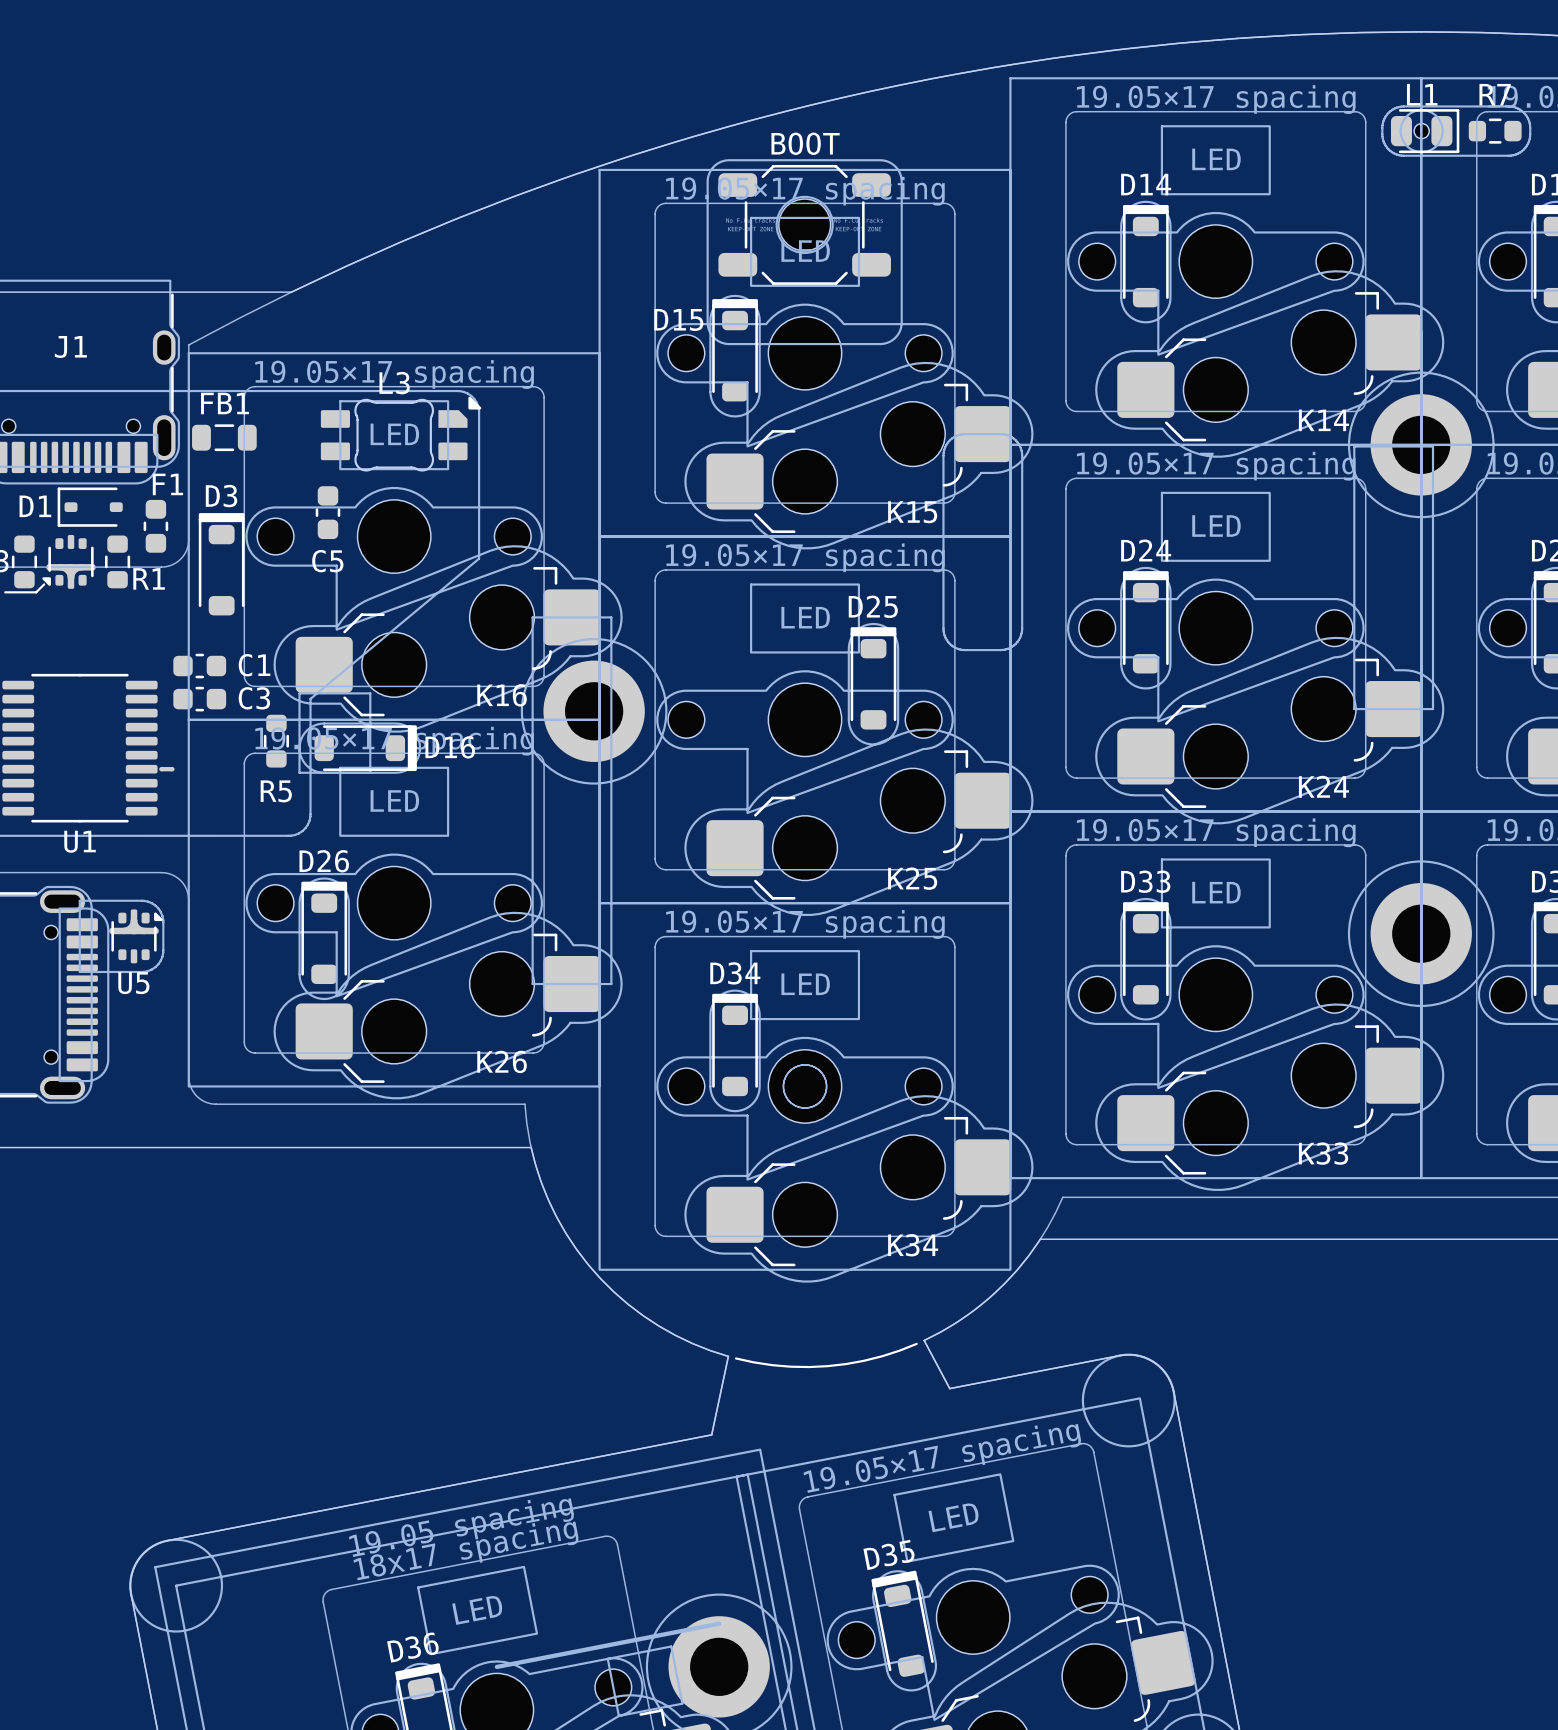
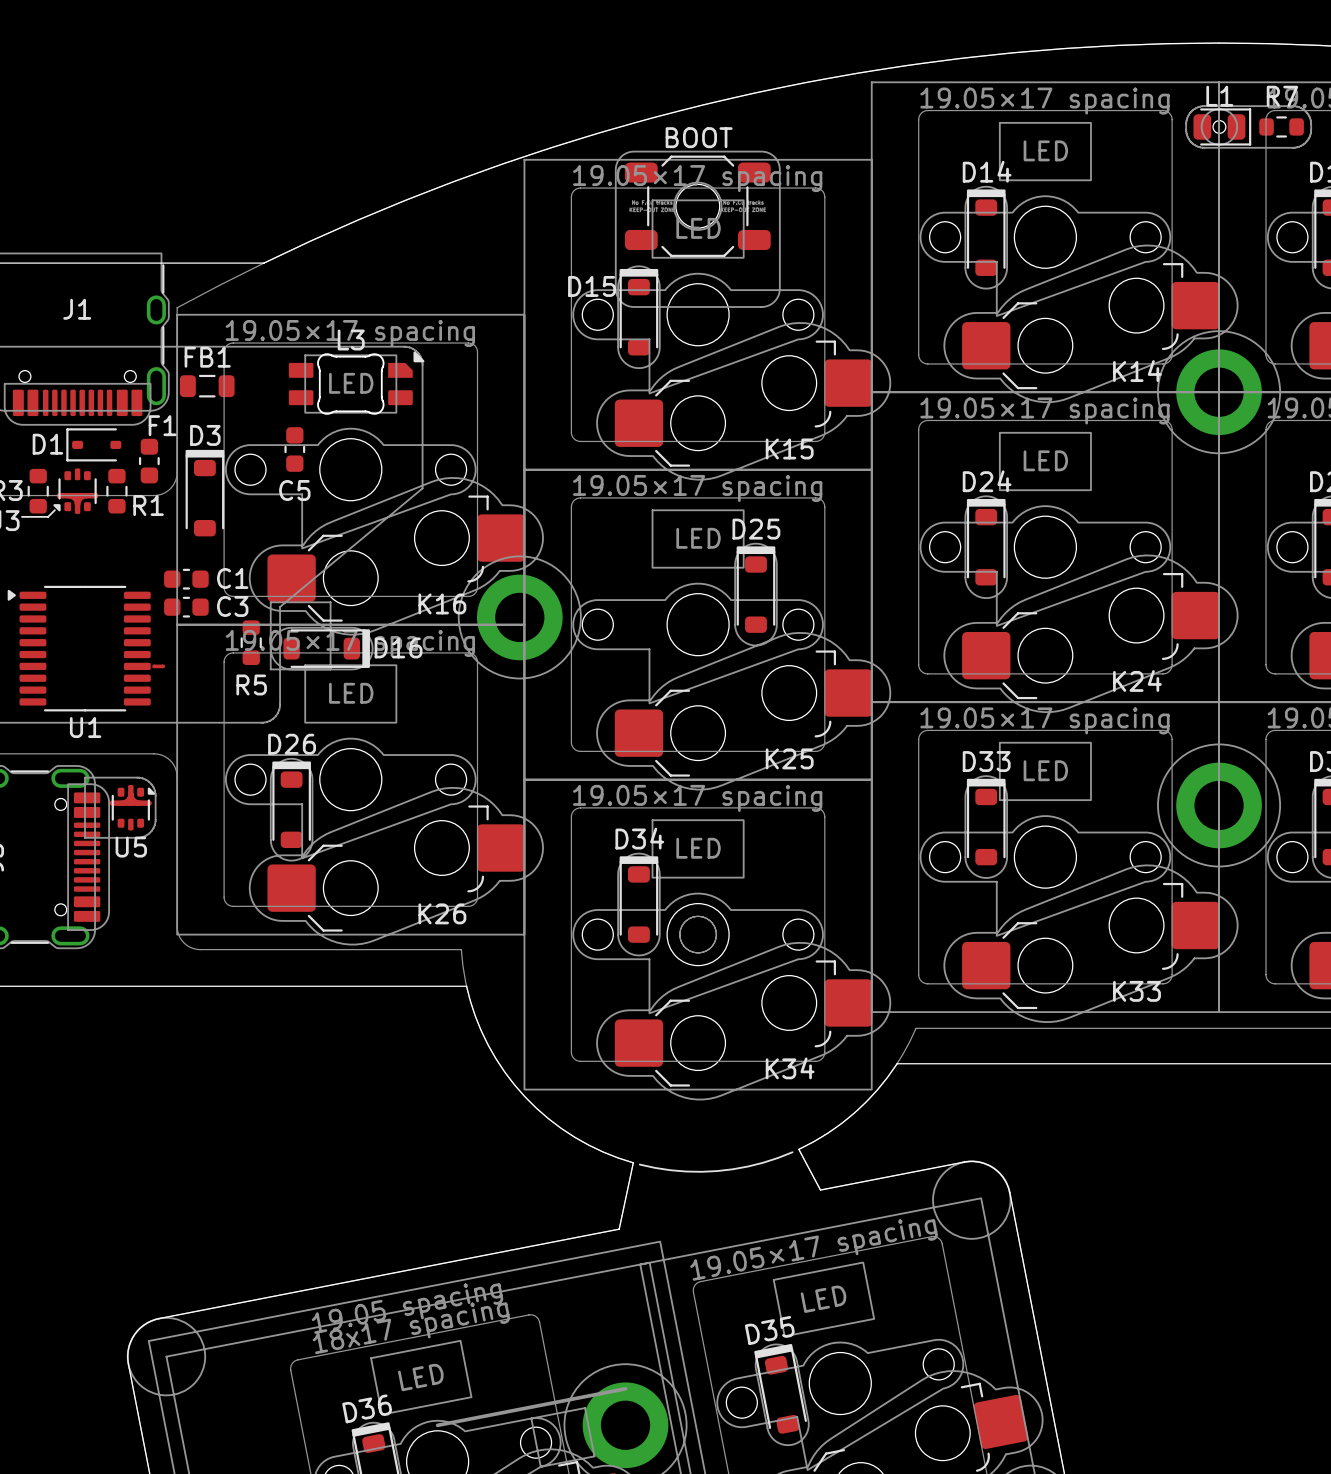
line: (965, 434) (1007, 435) (1017, 442) (1021, 450) (1022, 630) (1015, 643) (1005, 649) (960, 649) (949, 643) (944, 633) (943, 452) (949, 440) (956, 435) (965, 434) -> none
line: (1354, 446) (1433, 446) (1433, 709) (1354, 709) (1354, 446) -> none
line: (532, 617) (611, 617) (611, 984) (532, 984) (532, 617) -> none

